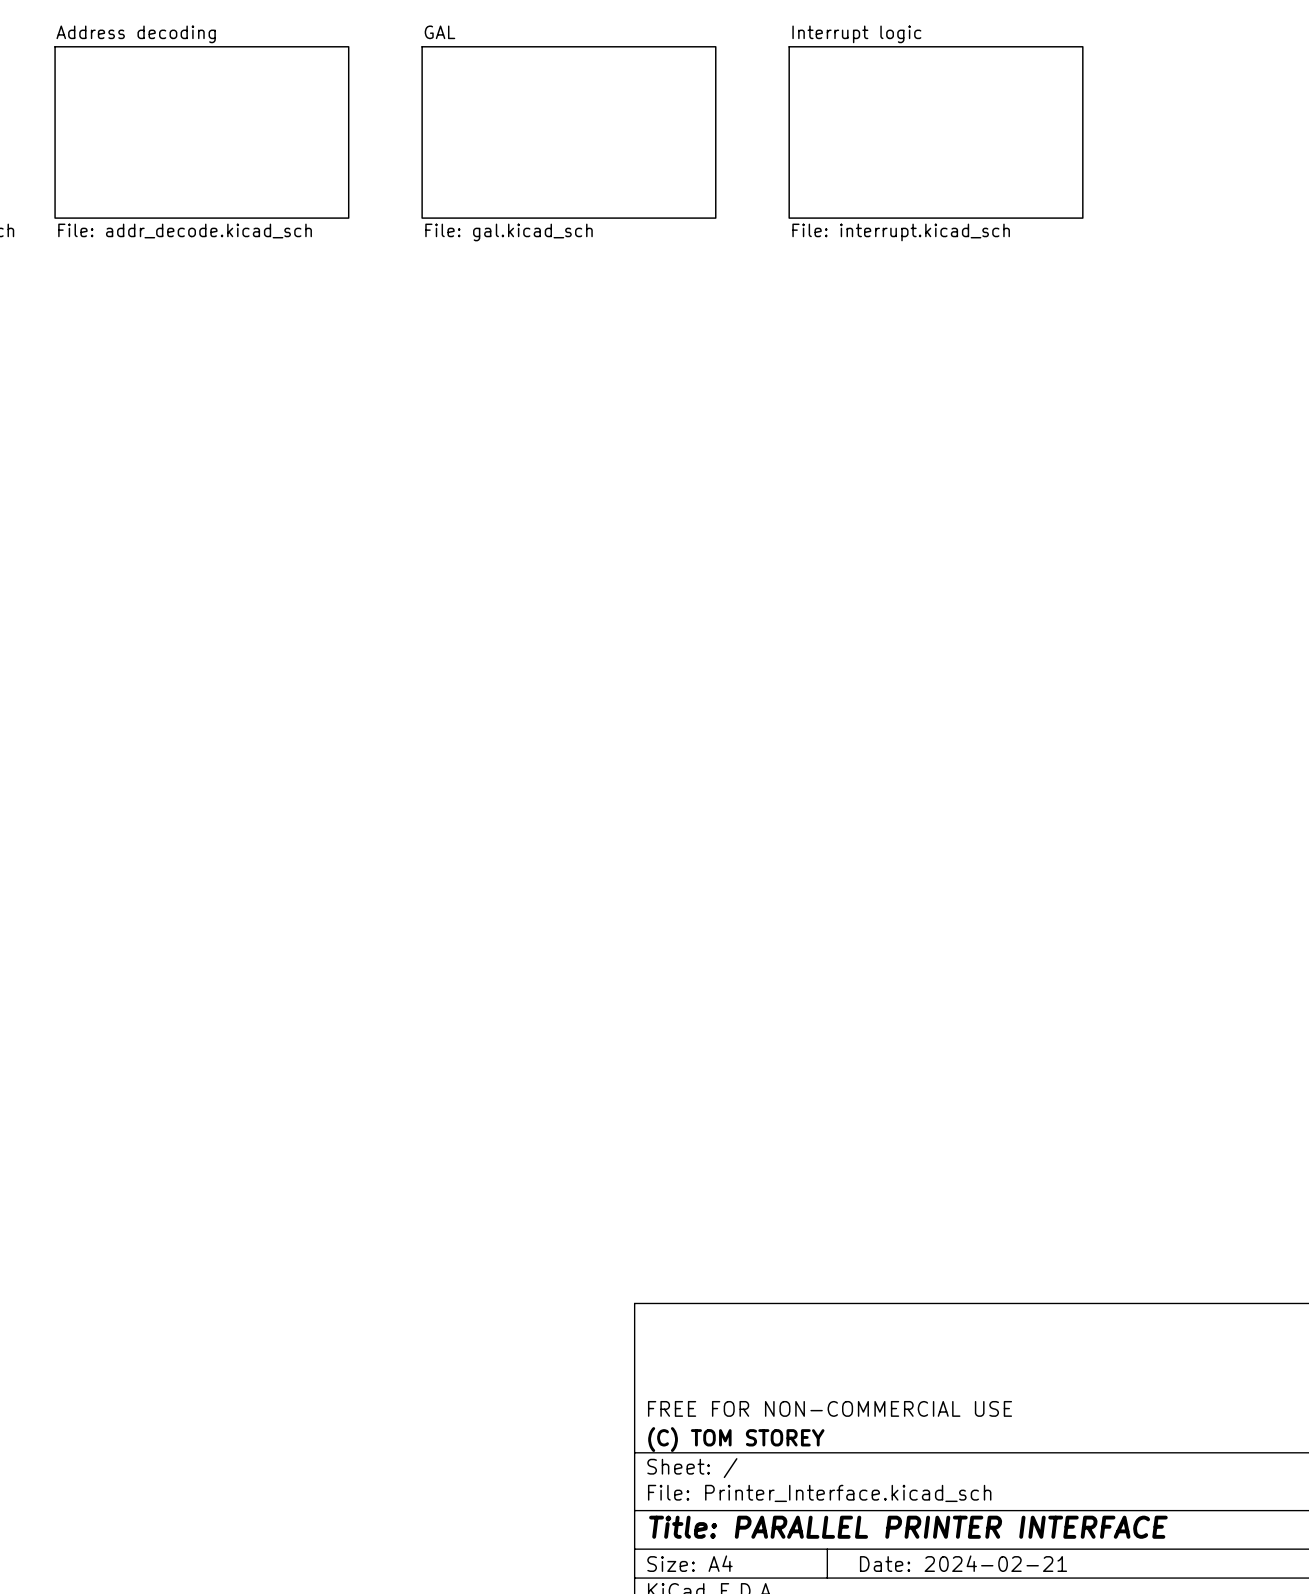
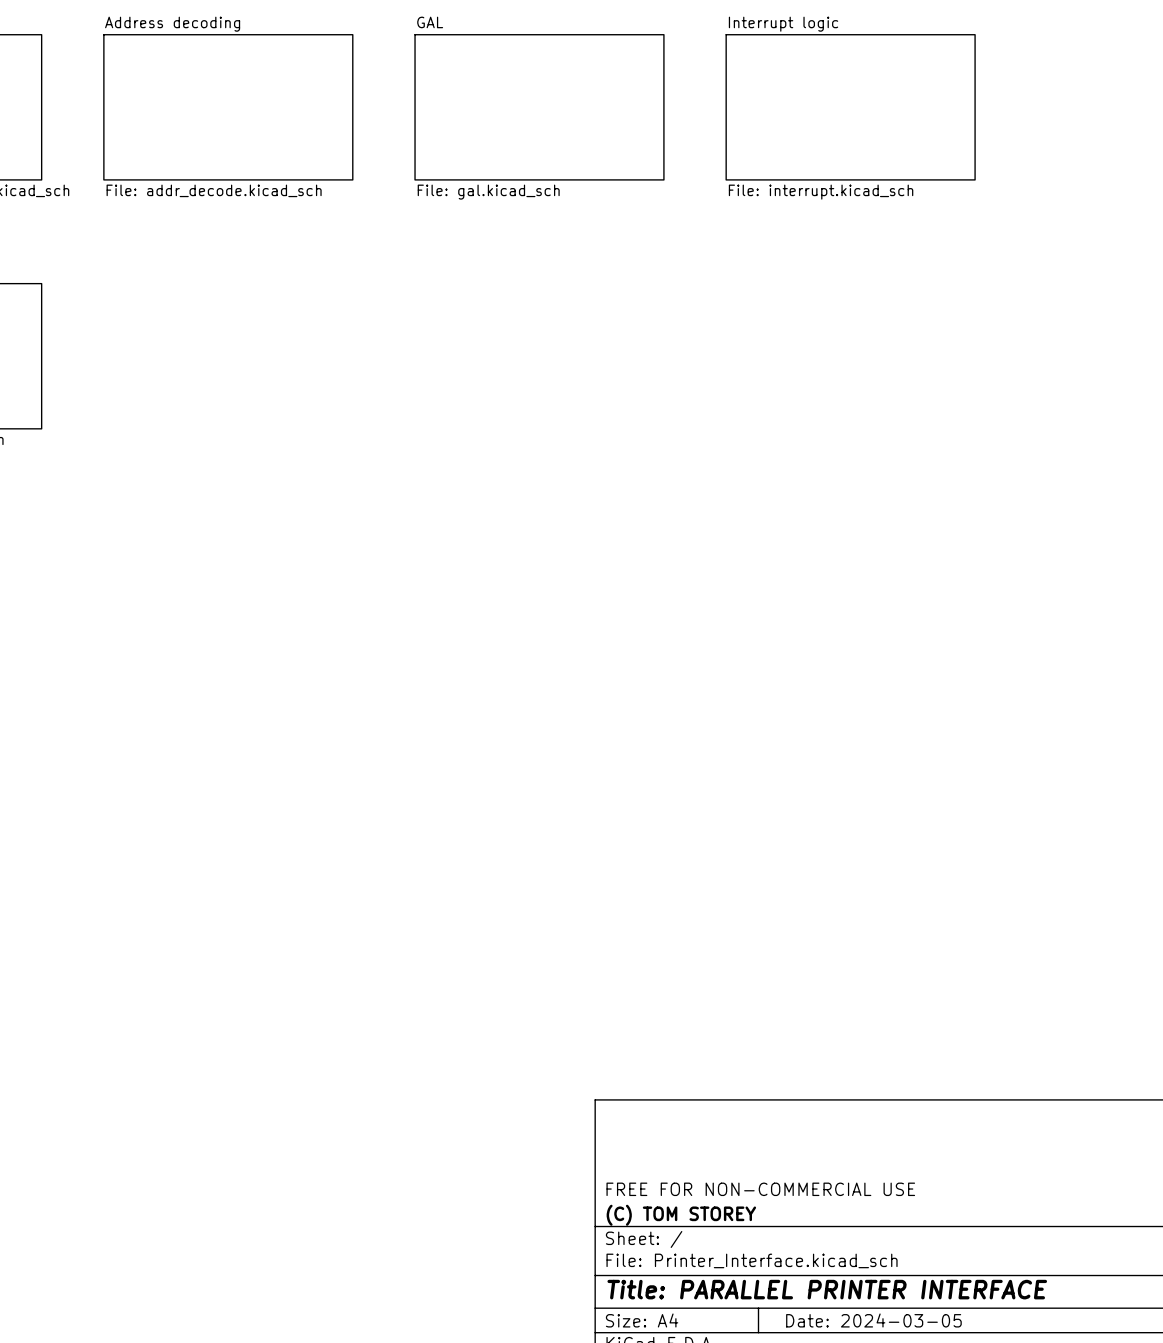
title block: Date: 2024-02-21 (963, 1563) -> Date: 2024-03-05 (873, 1320)

